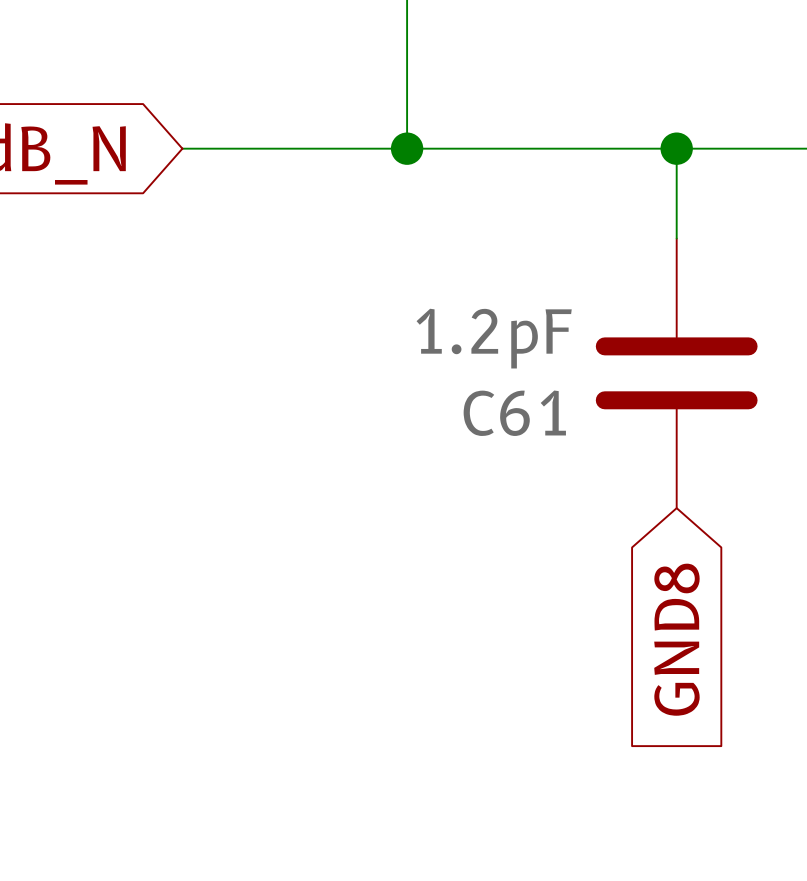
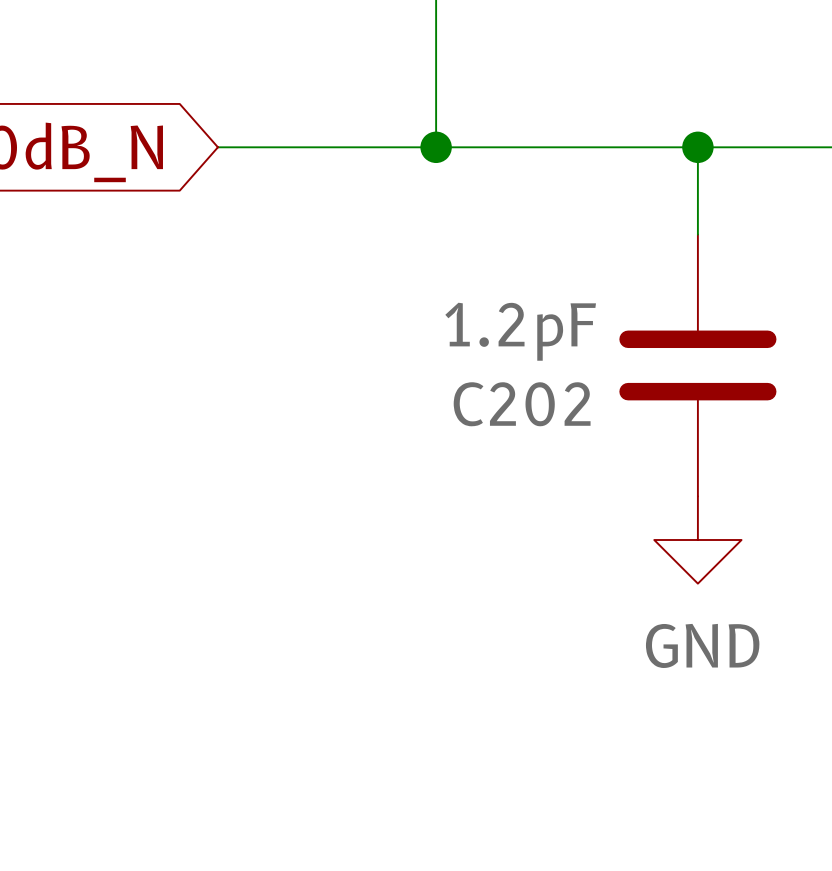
C61 name: C61 (514, 413) -> C202 (522, 404)
power symbol: none -> GND (697, 540)
global label: GND8 (676, 639) -> none

